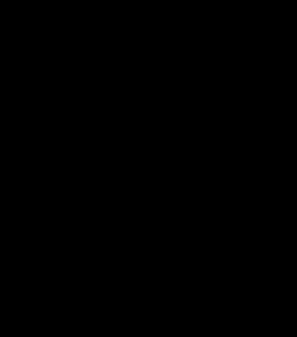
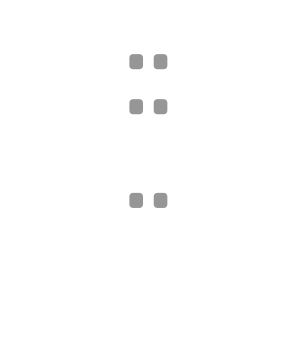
part: none -> (148, 61)
part: none -> (148, 106)
part: none -> (148, 200)

